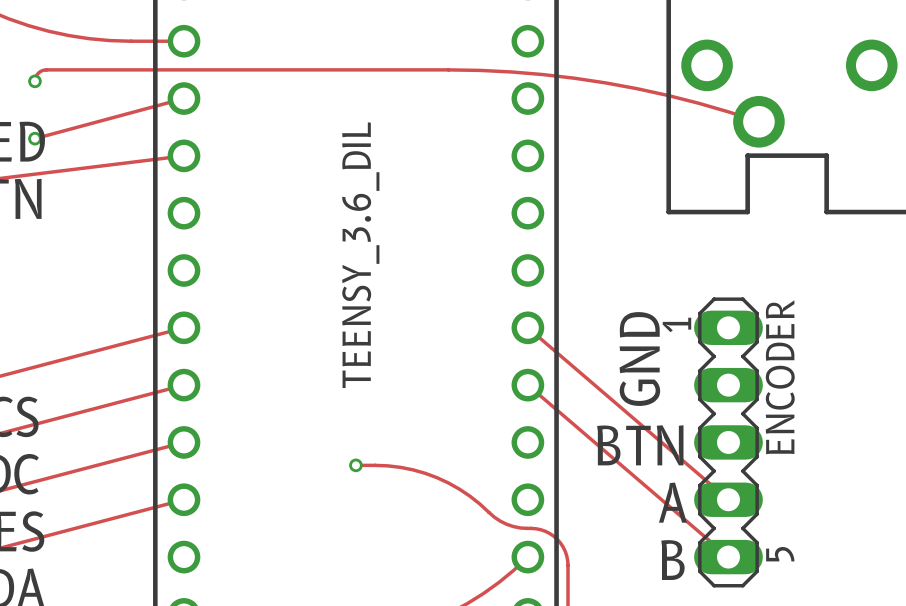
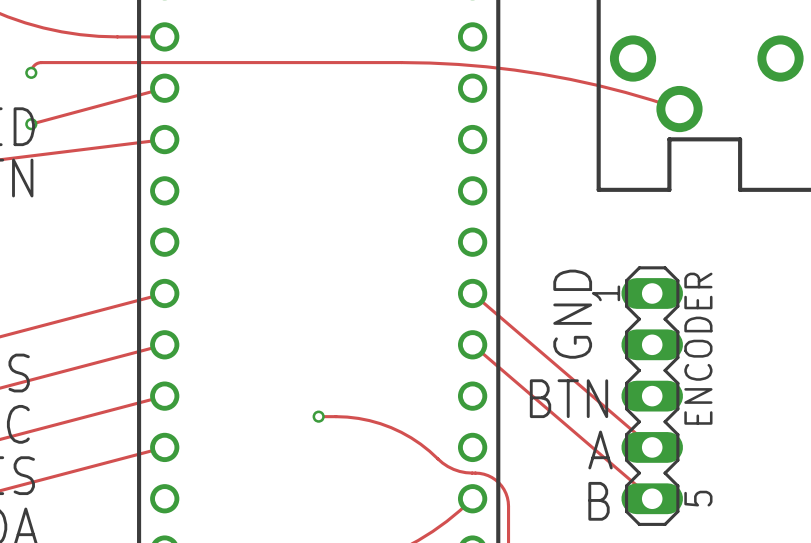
part value: TEENSY_3.6_DIL (360, 255) -> none

